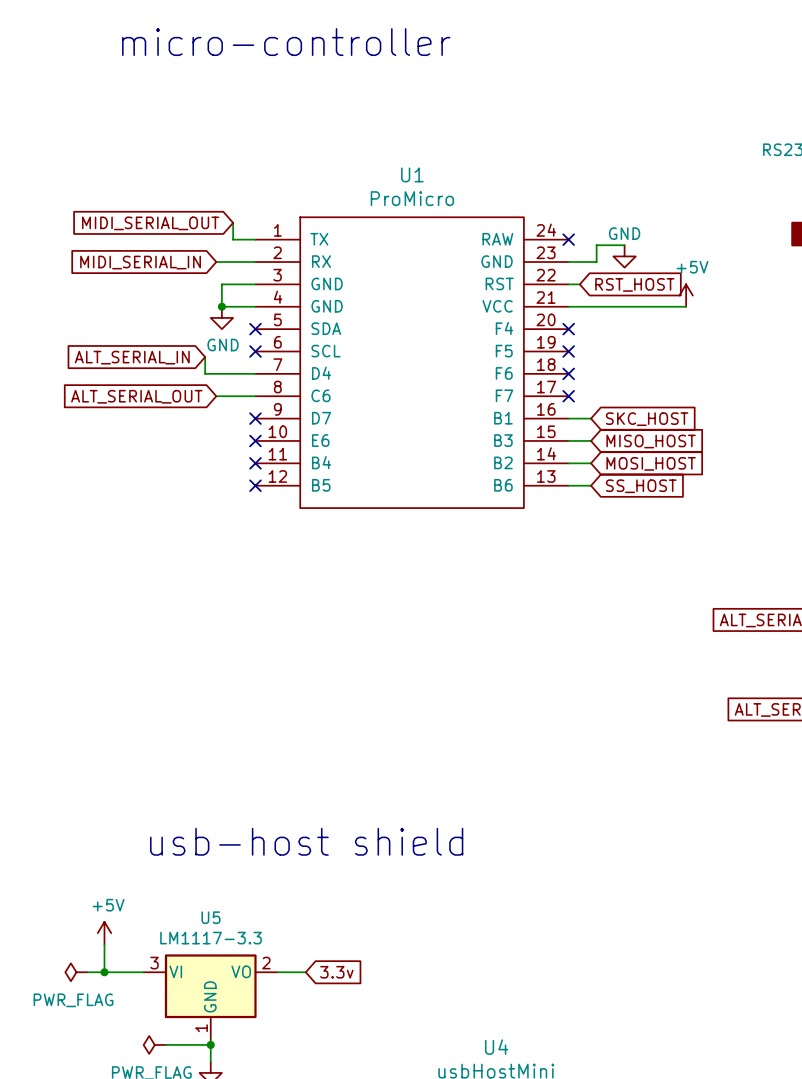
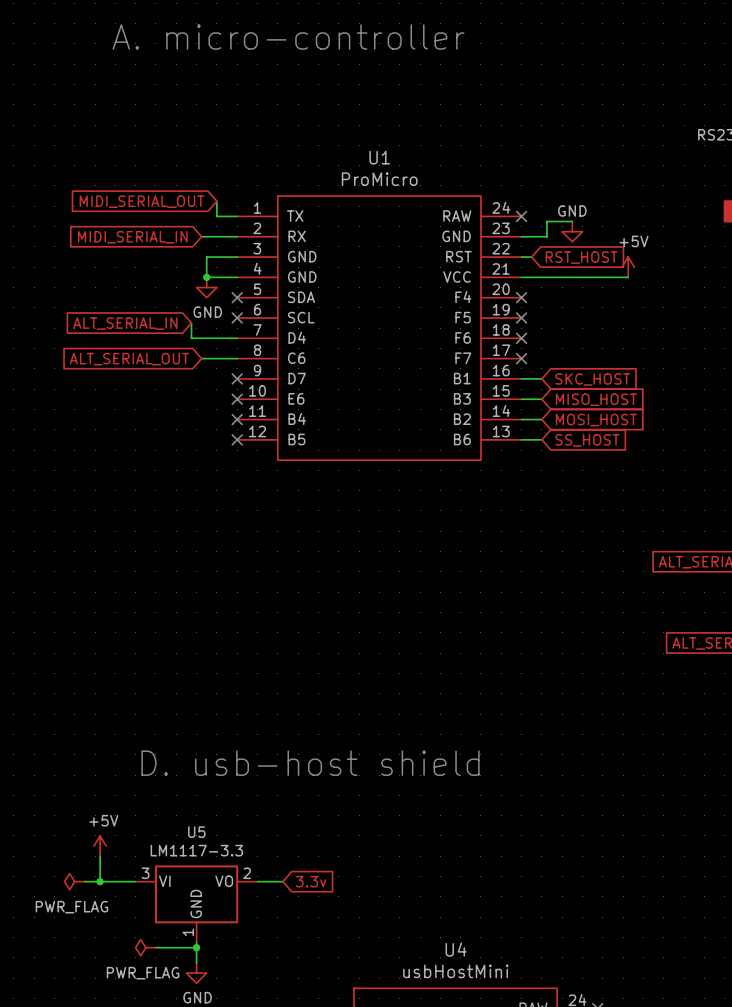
text: micro-controller (286, 42) -> A. micro-controller (288, 37)
text: usb-host shield (306, 841) -> D. usb-host shield (310, 763)

